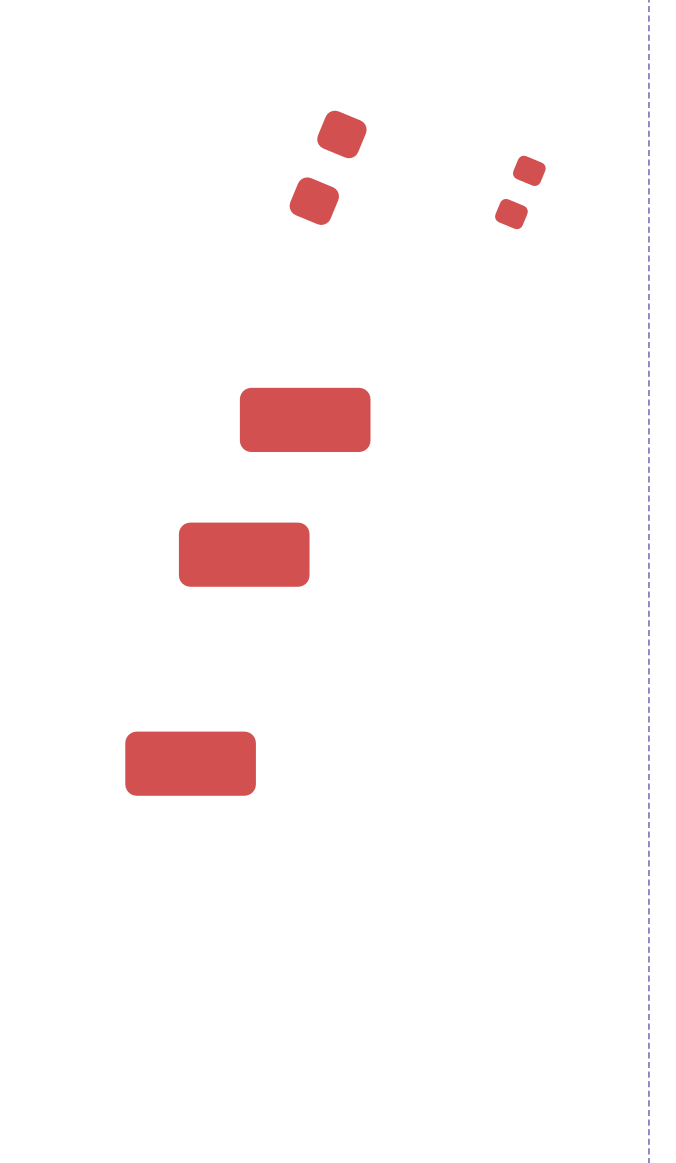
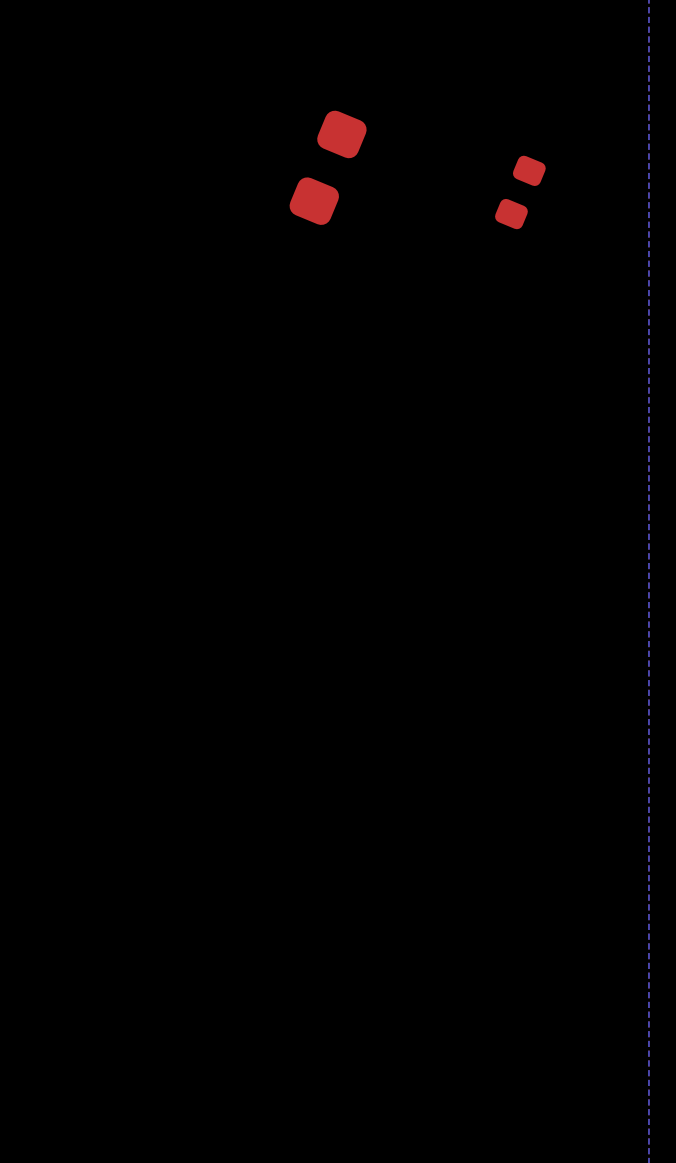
part: (305, 419) -> none
part: (244, 554) -> none
part: (190, 763) -> none

